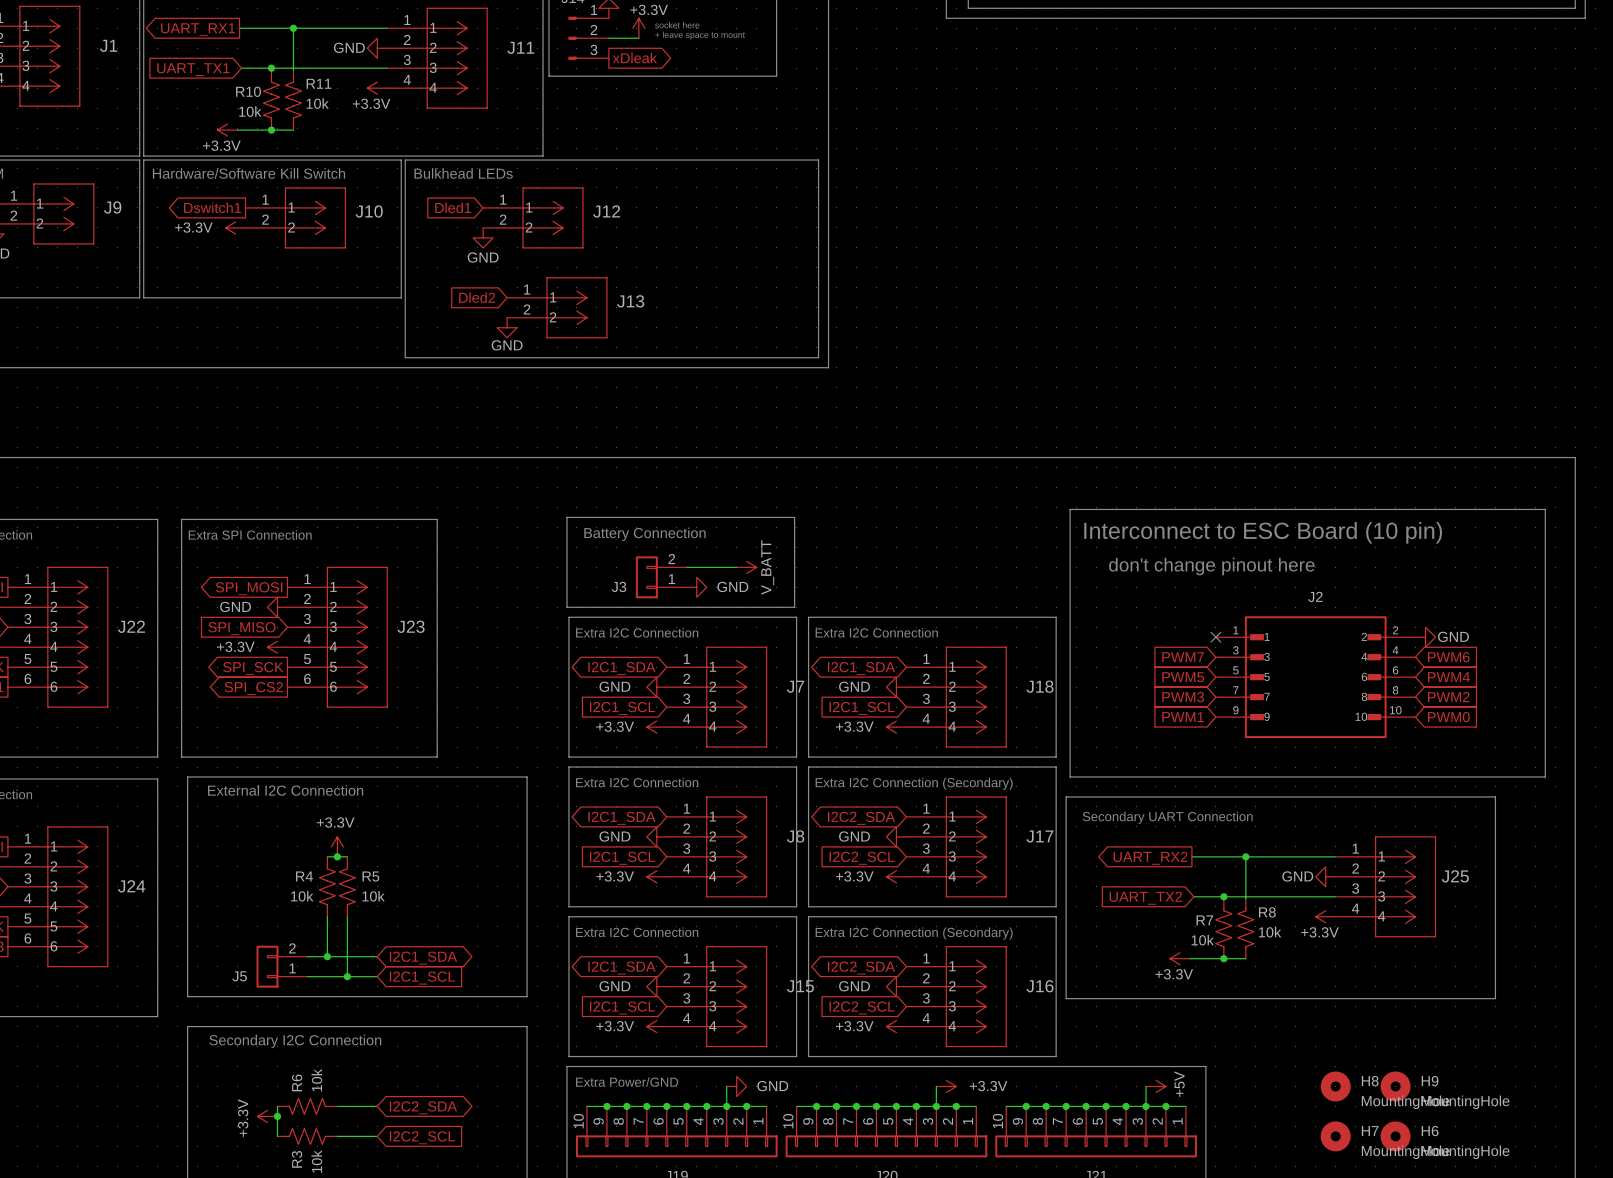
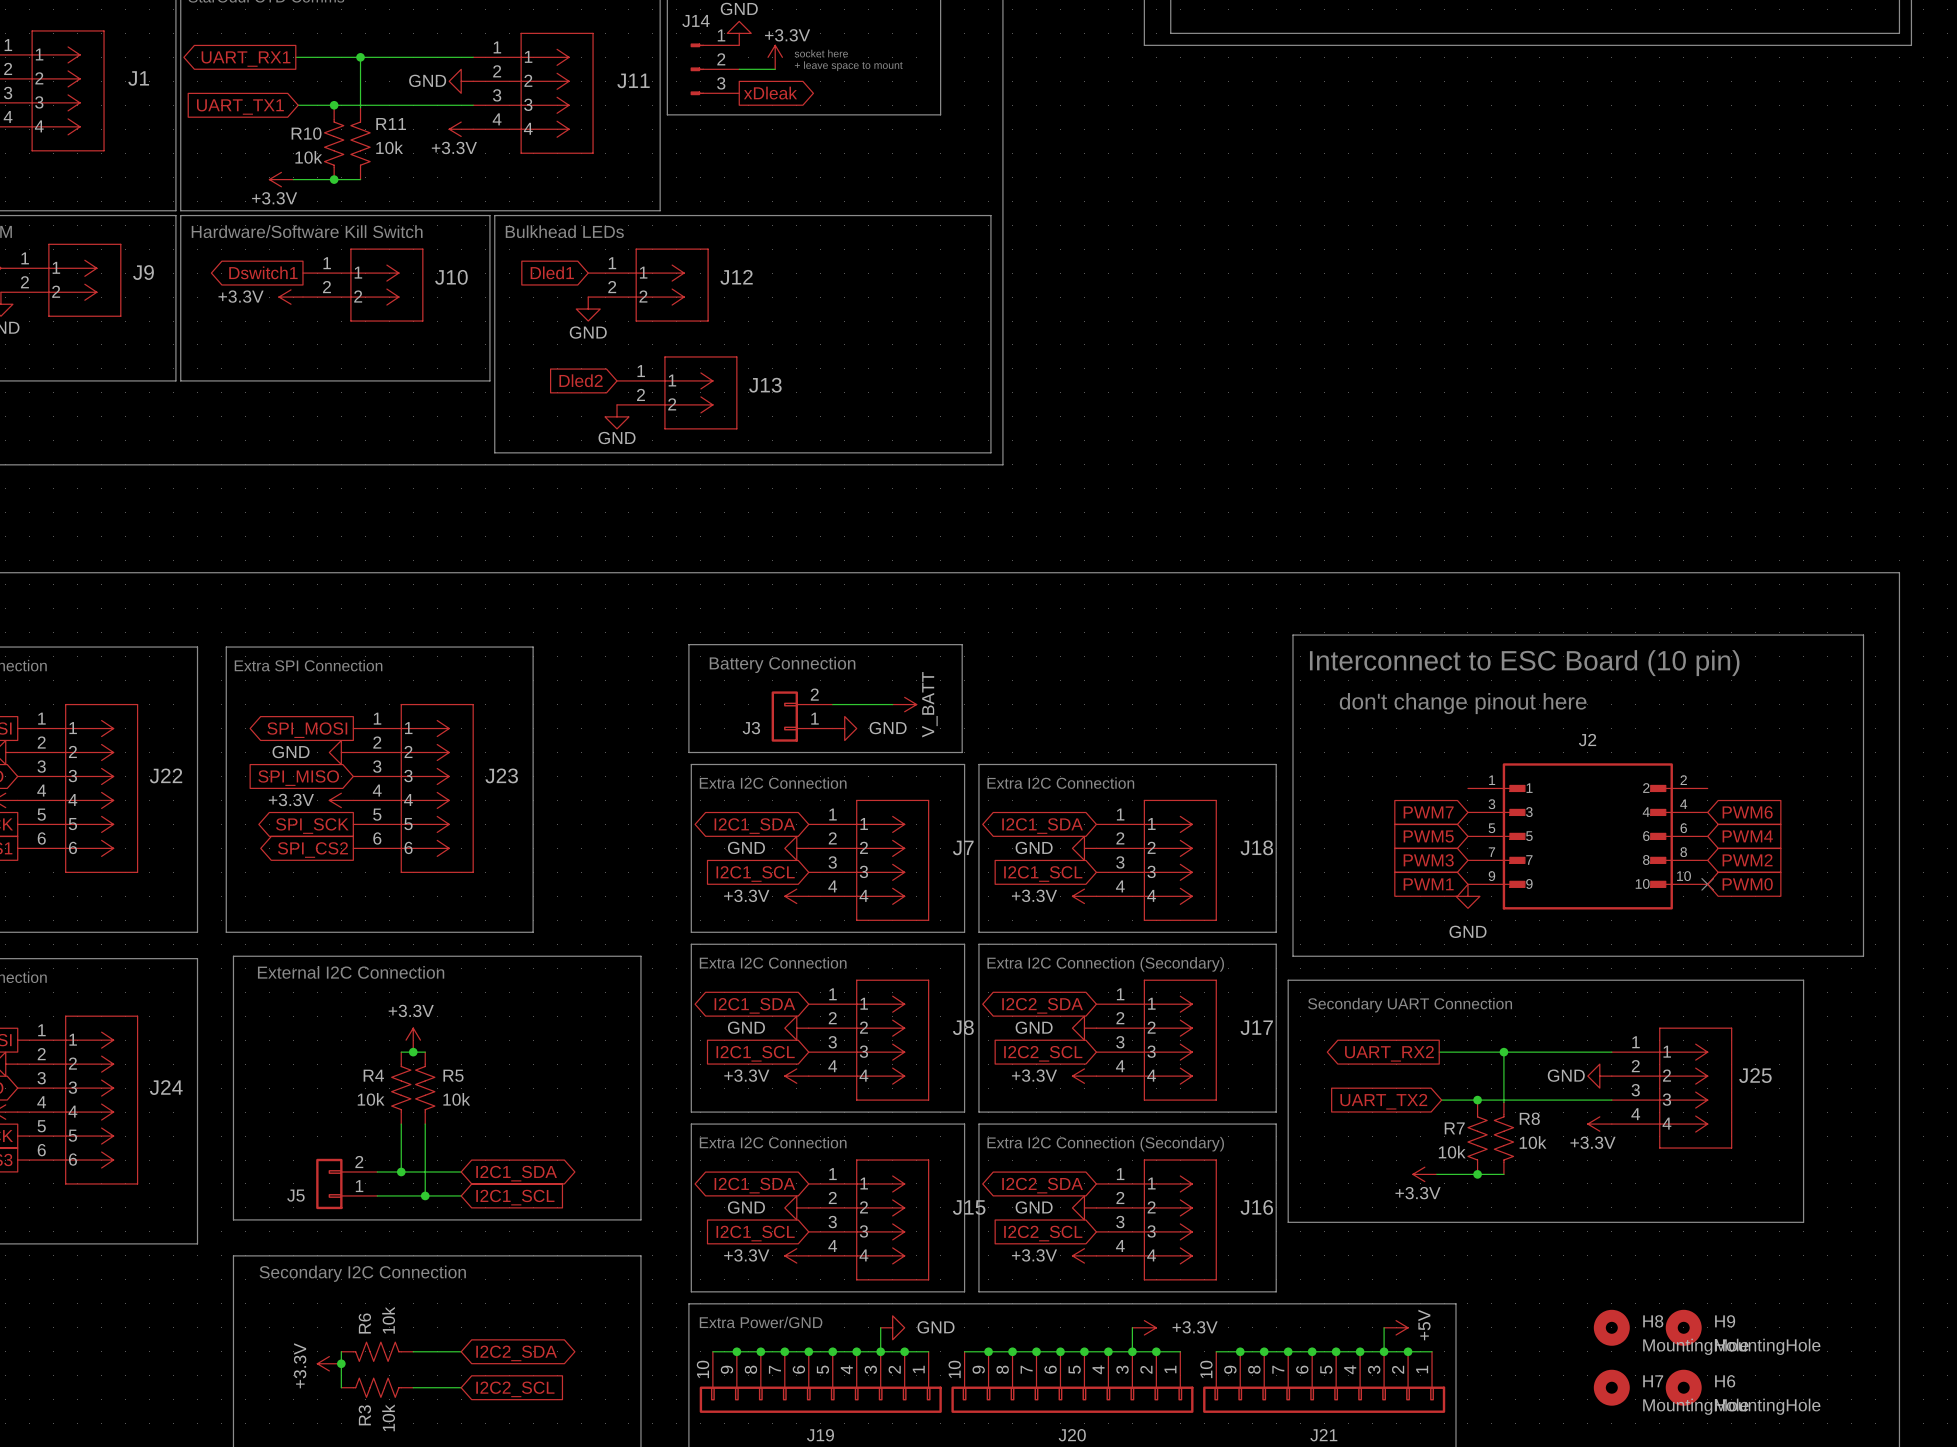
no-connect mark: (1215, 637) -> none
power symbol: GND (1425, 637) -> none
no-connect mark: none -> (1707, 884)
power symbol: none -> GND (1467, 896)

